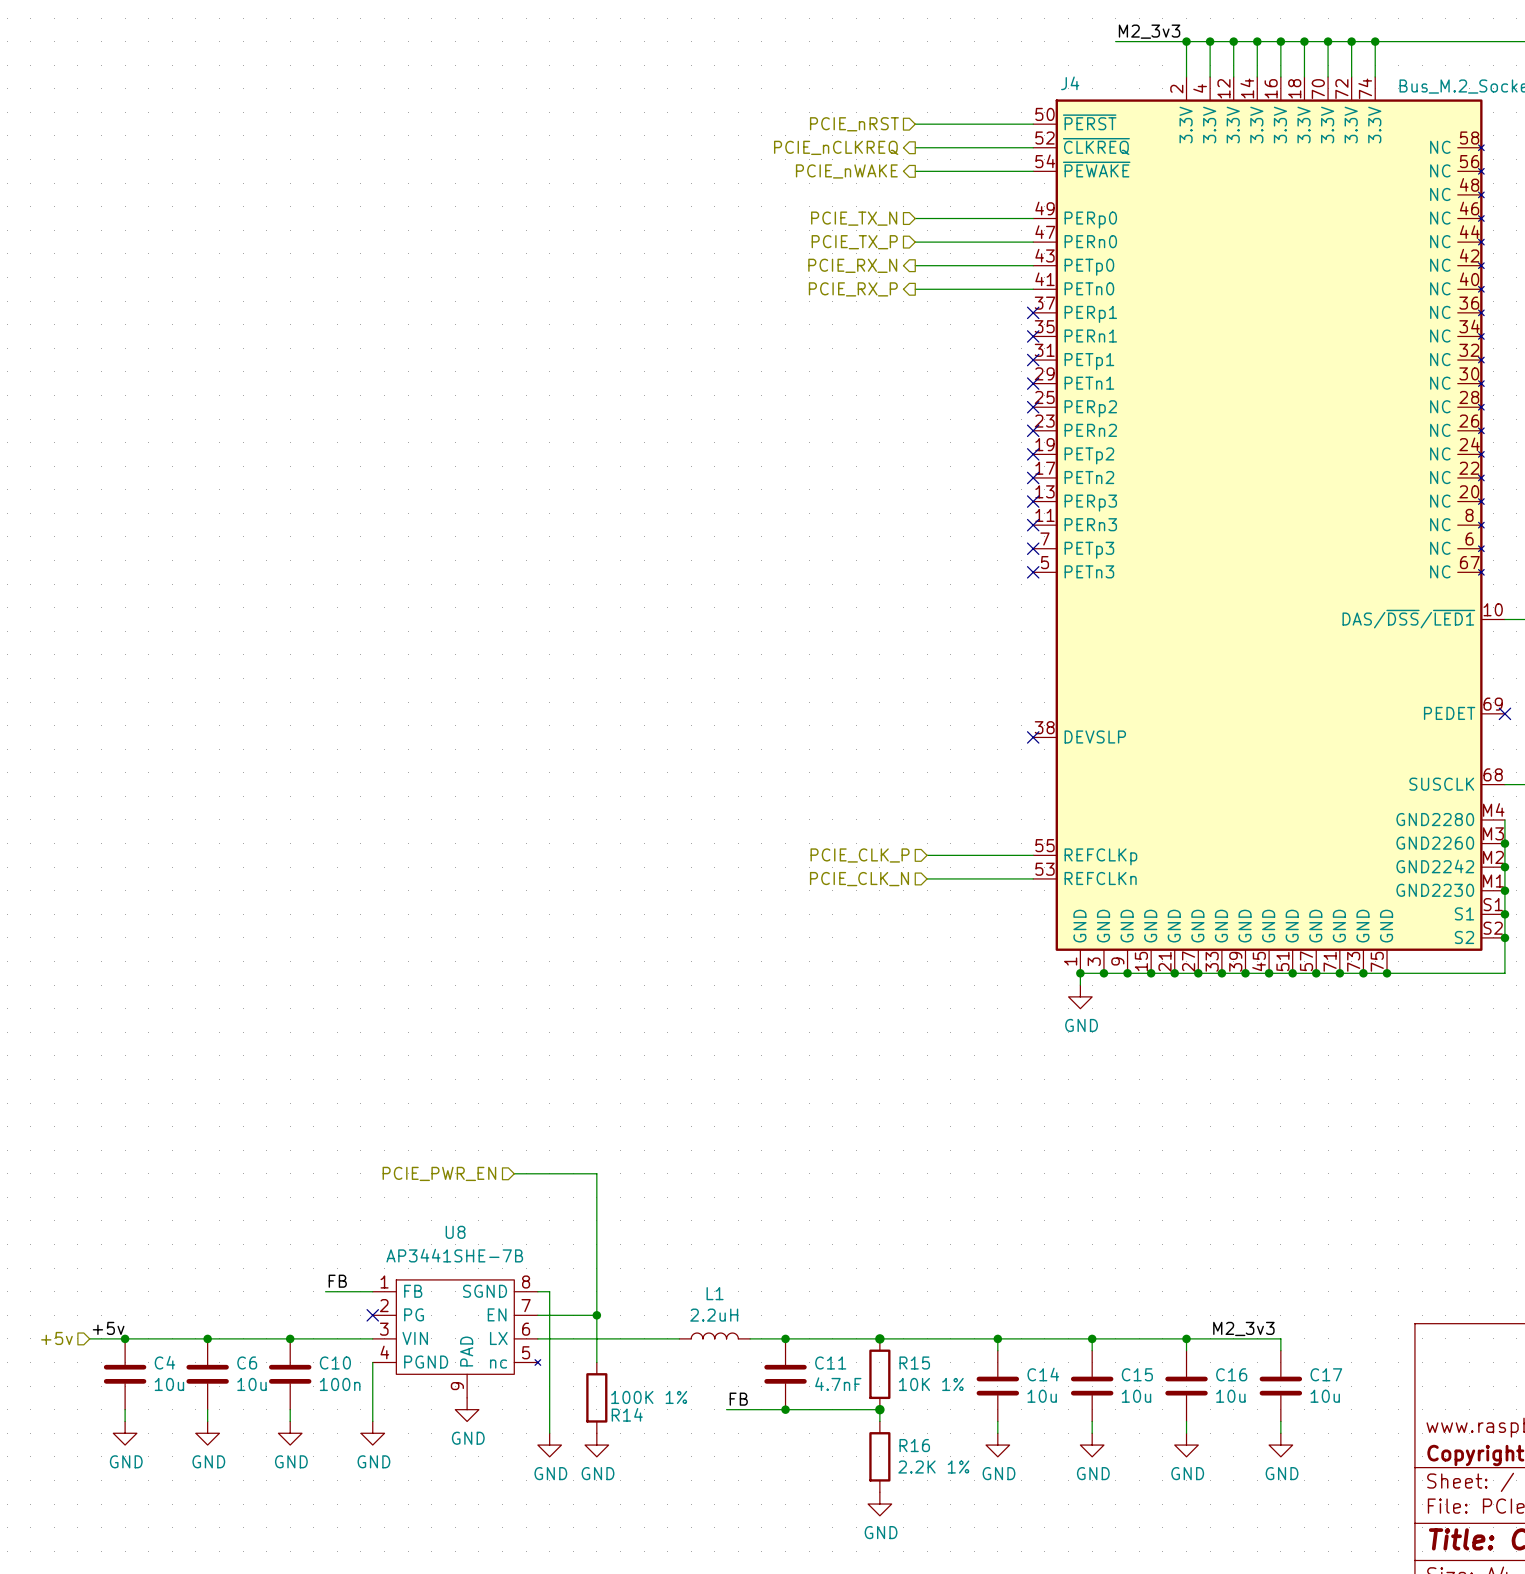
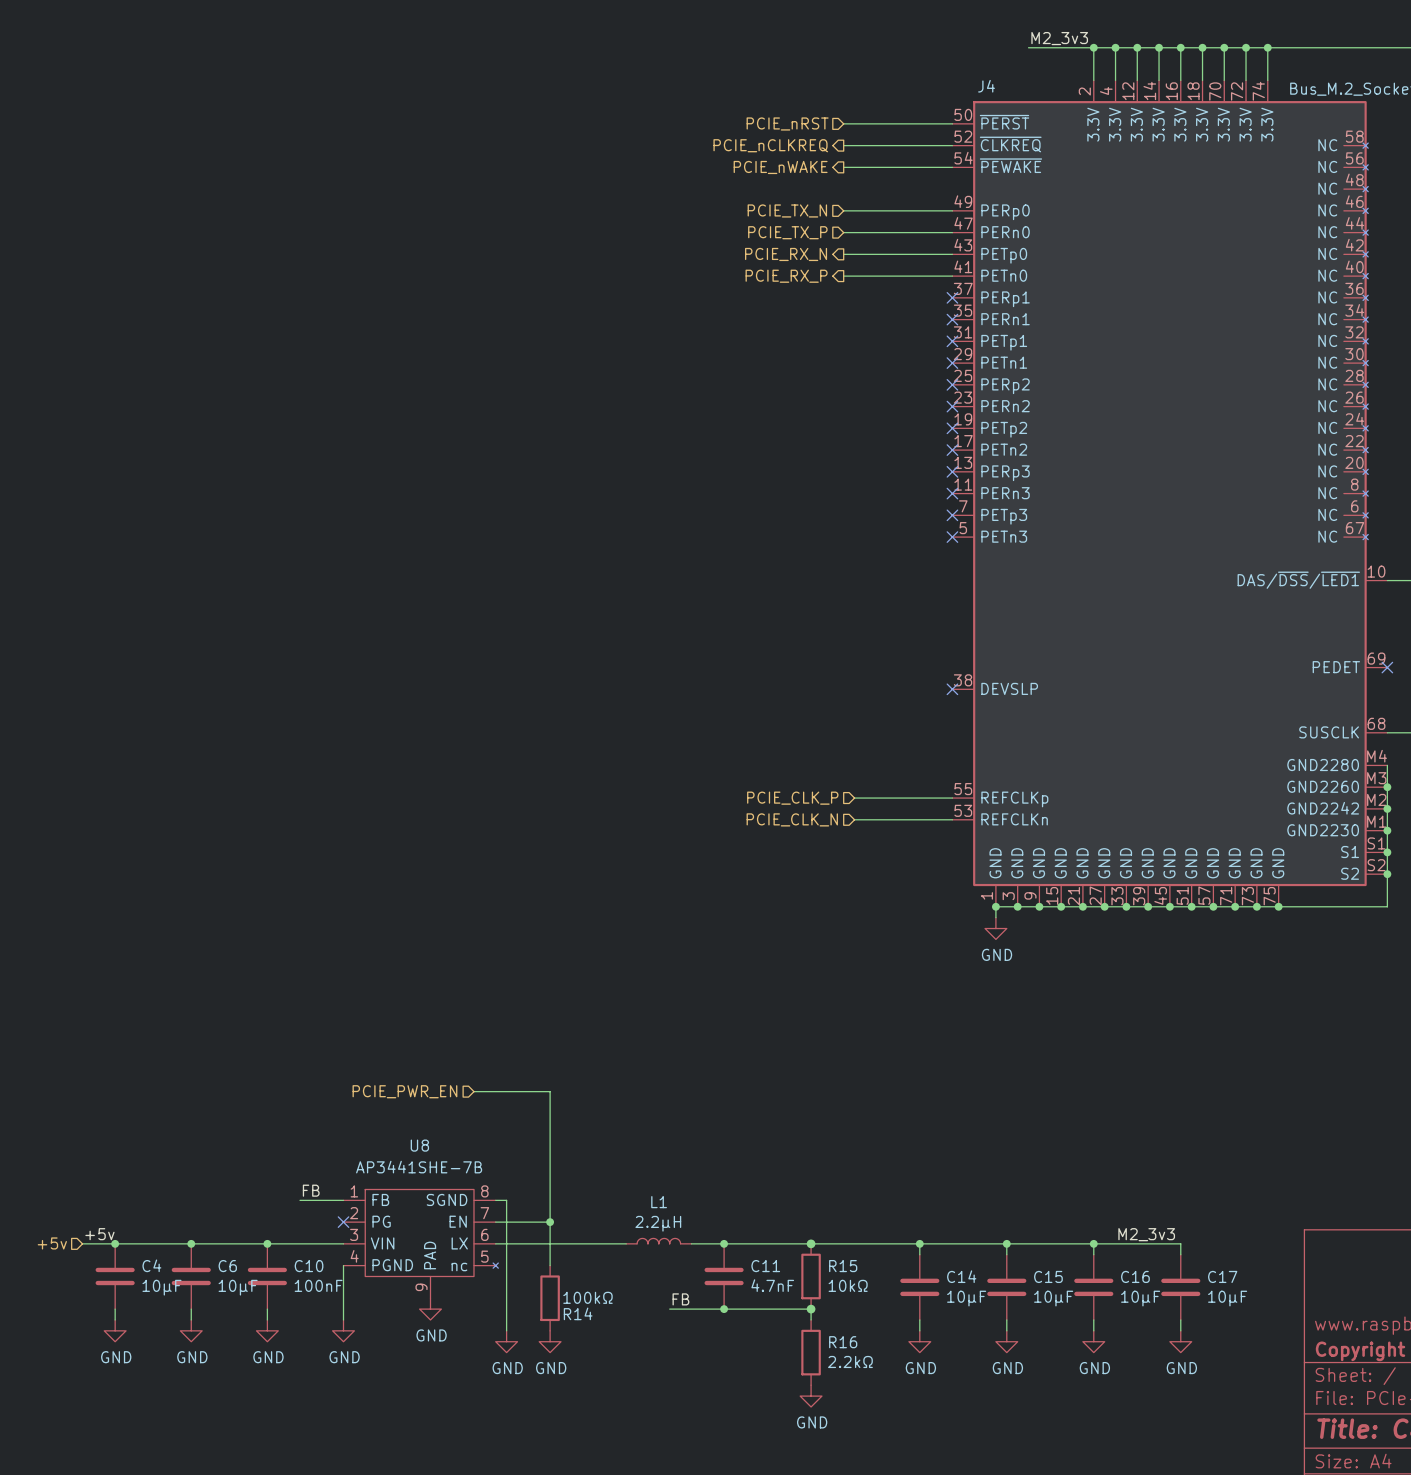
L1 value: 2.2uH (714, 1315) -> 2.2µH (658, 1223)
C4 value: 10u (169, 1384) -> 10µF (161, 1287)
C6 value: 10u (251, 1384) -> 10µF (238, 1287)
C10 value: 100n (340, 1384) -> 100nF (318, 1285)
R15 value: 10K 1% (931, 1384) -> 10kΩ (848, 1285)
C14 value: 10u (1042, 1396) -> 10µF (966, 1298)
C15 value: 10u (1136, 1396) -> 10µF (1053, 1298)
C16 value: 10u (1230, 1396) -> 10µF (1140, 1298)
C17 value: 10u (1325, 1396) -> 10µF (1227, 1298)
R14 value: 100K 1% (649, 1397) -> 100kΩ (587, 1297)
R16 value: 2.2K 1% (933, 1467) -> 2.2kΩ (850, 1361)

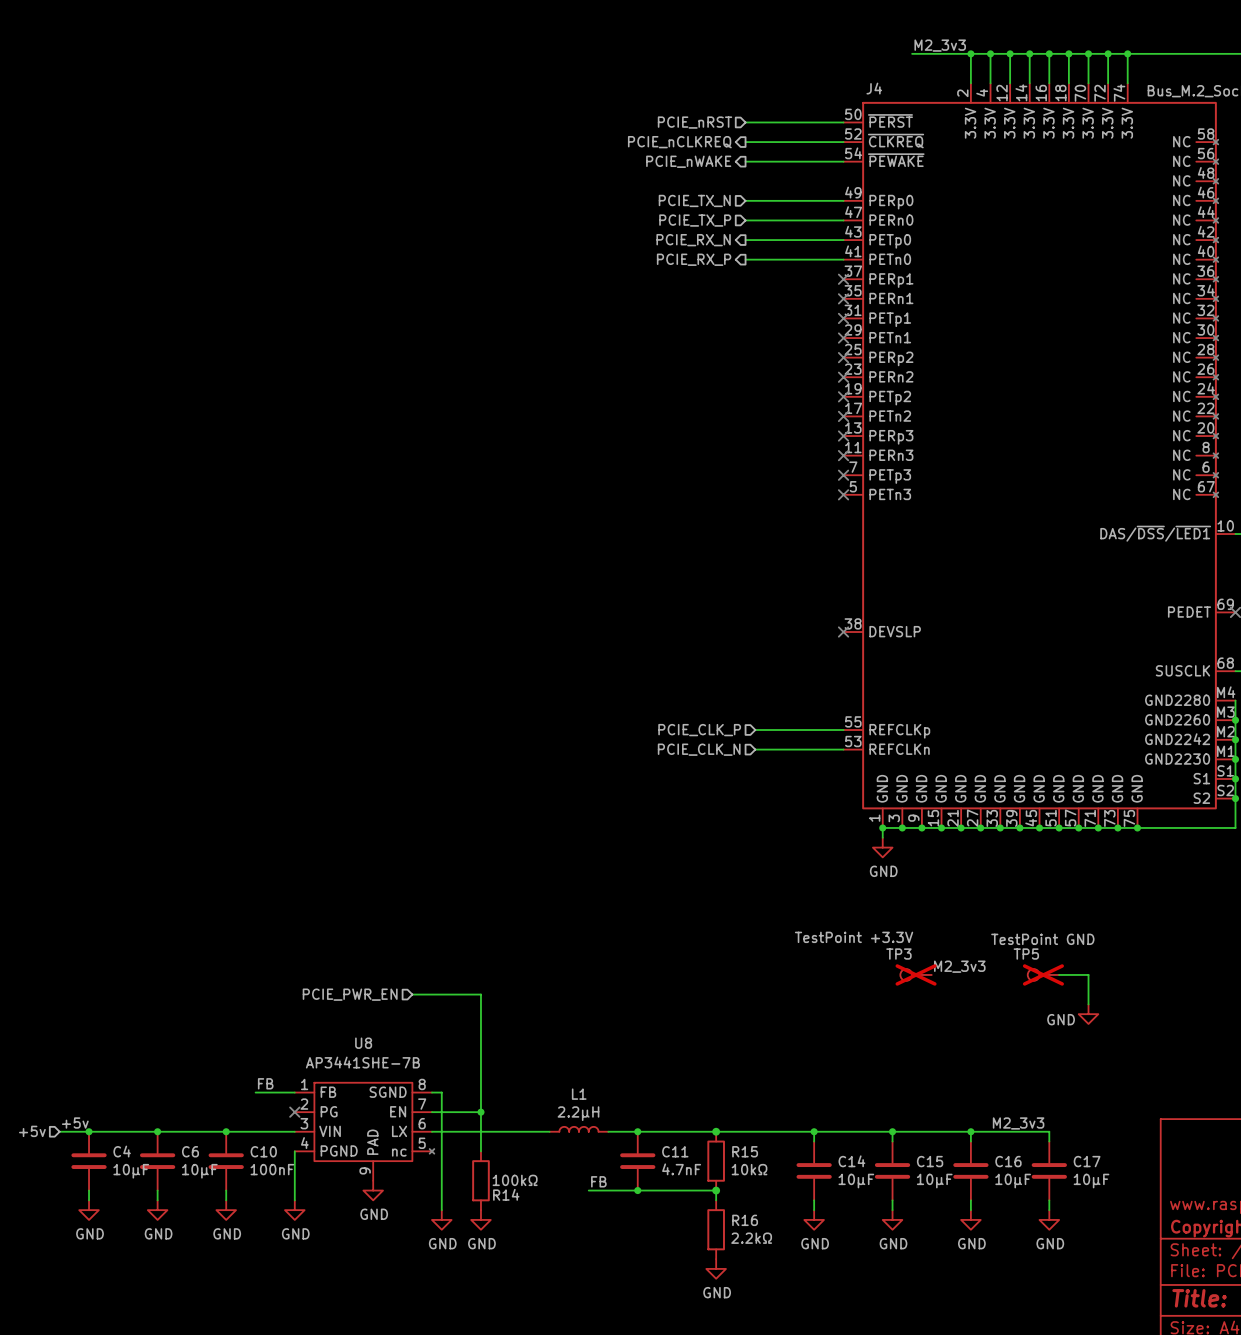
label: none -> M2_3v3 (959, 966)
TP3: none -> TestPoint +3.3V (916, 974)
TP5: none -> TestPoint GND (1043, 974)
wire: none -> (1059, 974) (1088, 974) (1088, 1004)
power symbol: none -> GND (1088, 1014)

